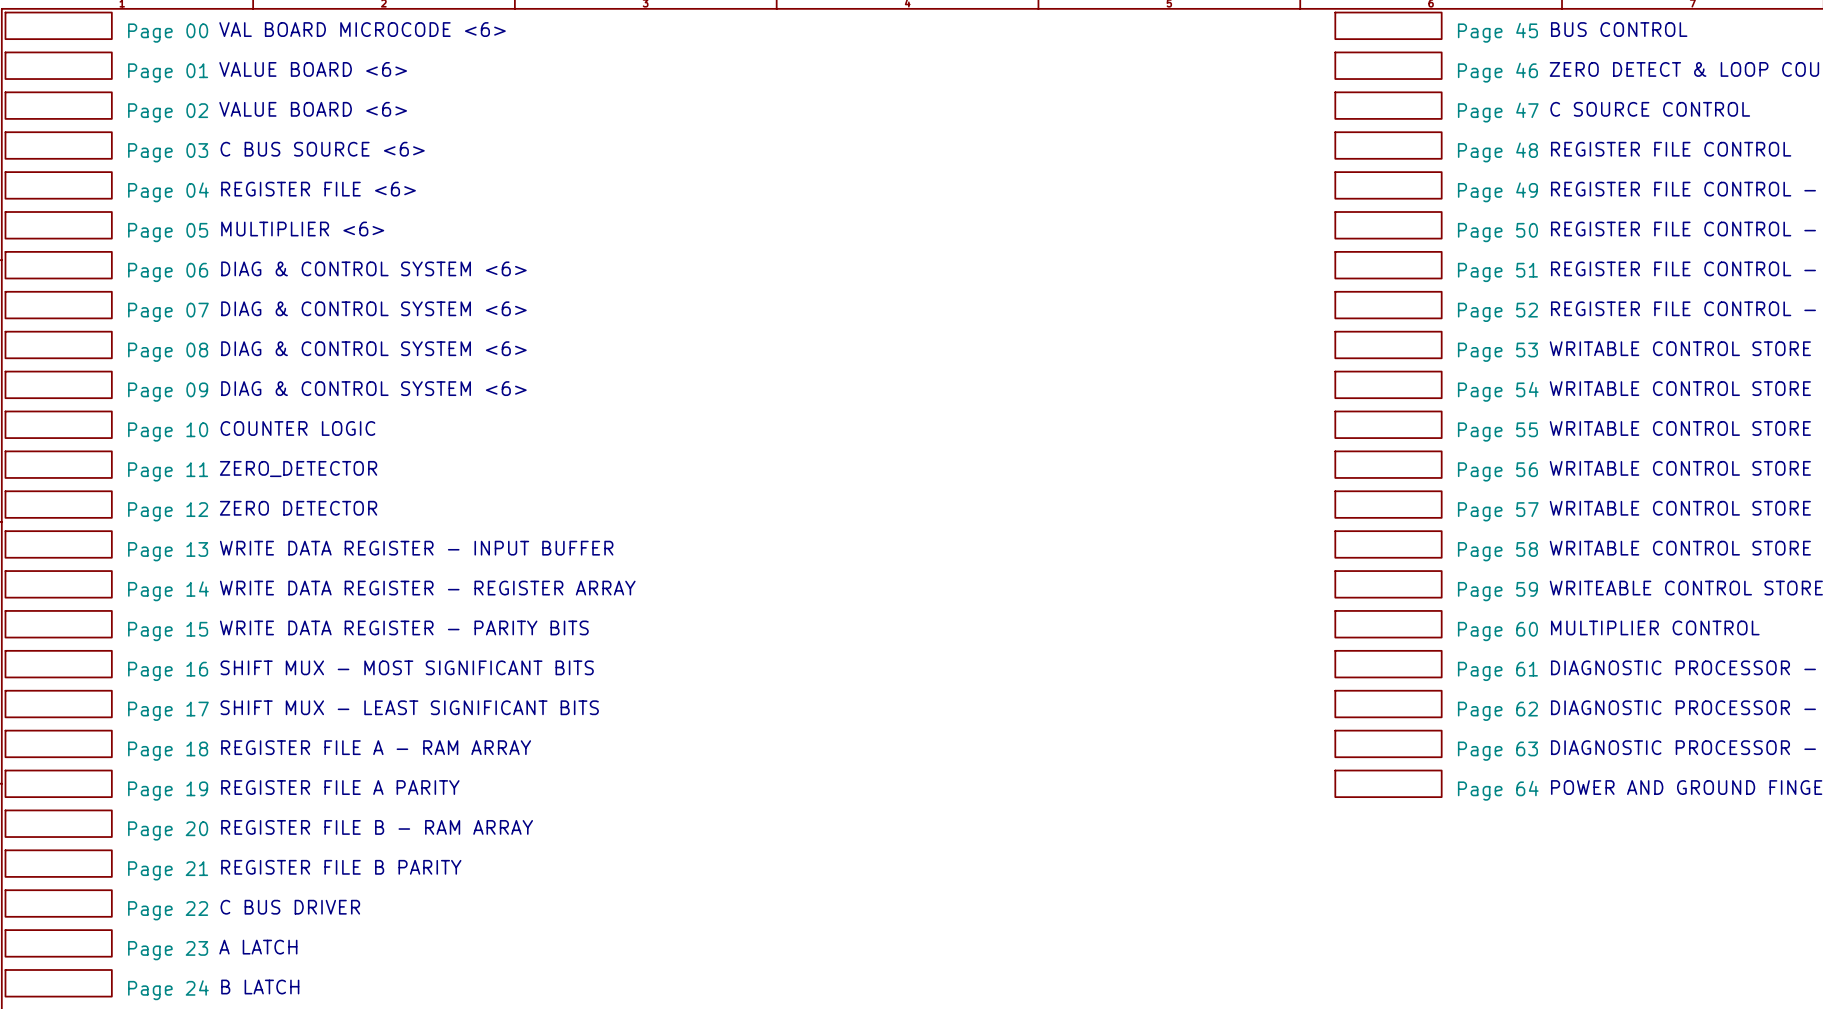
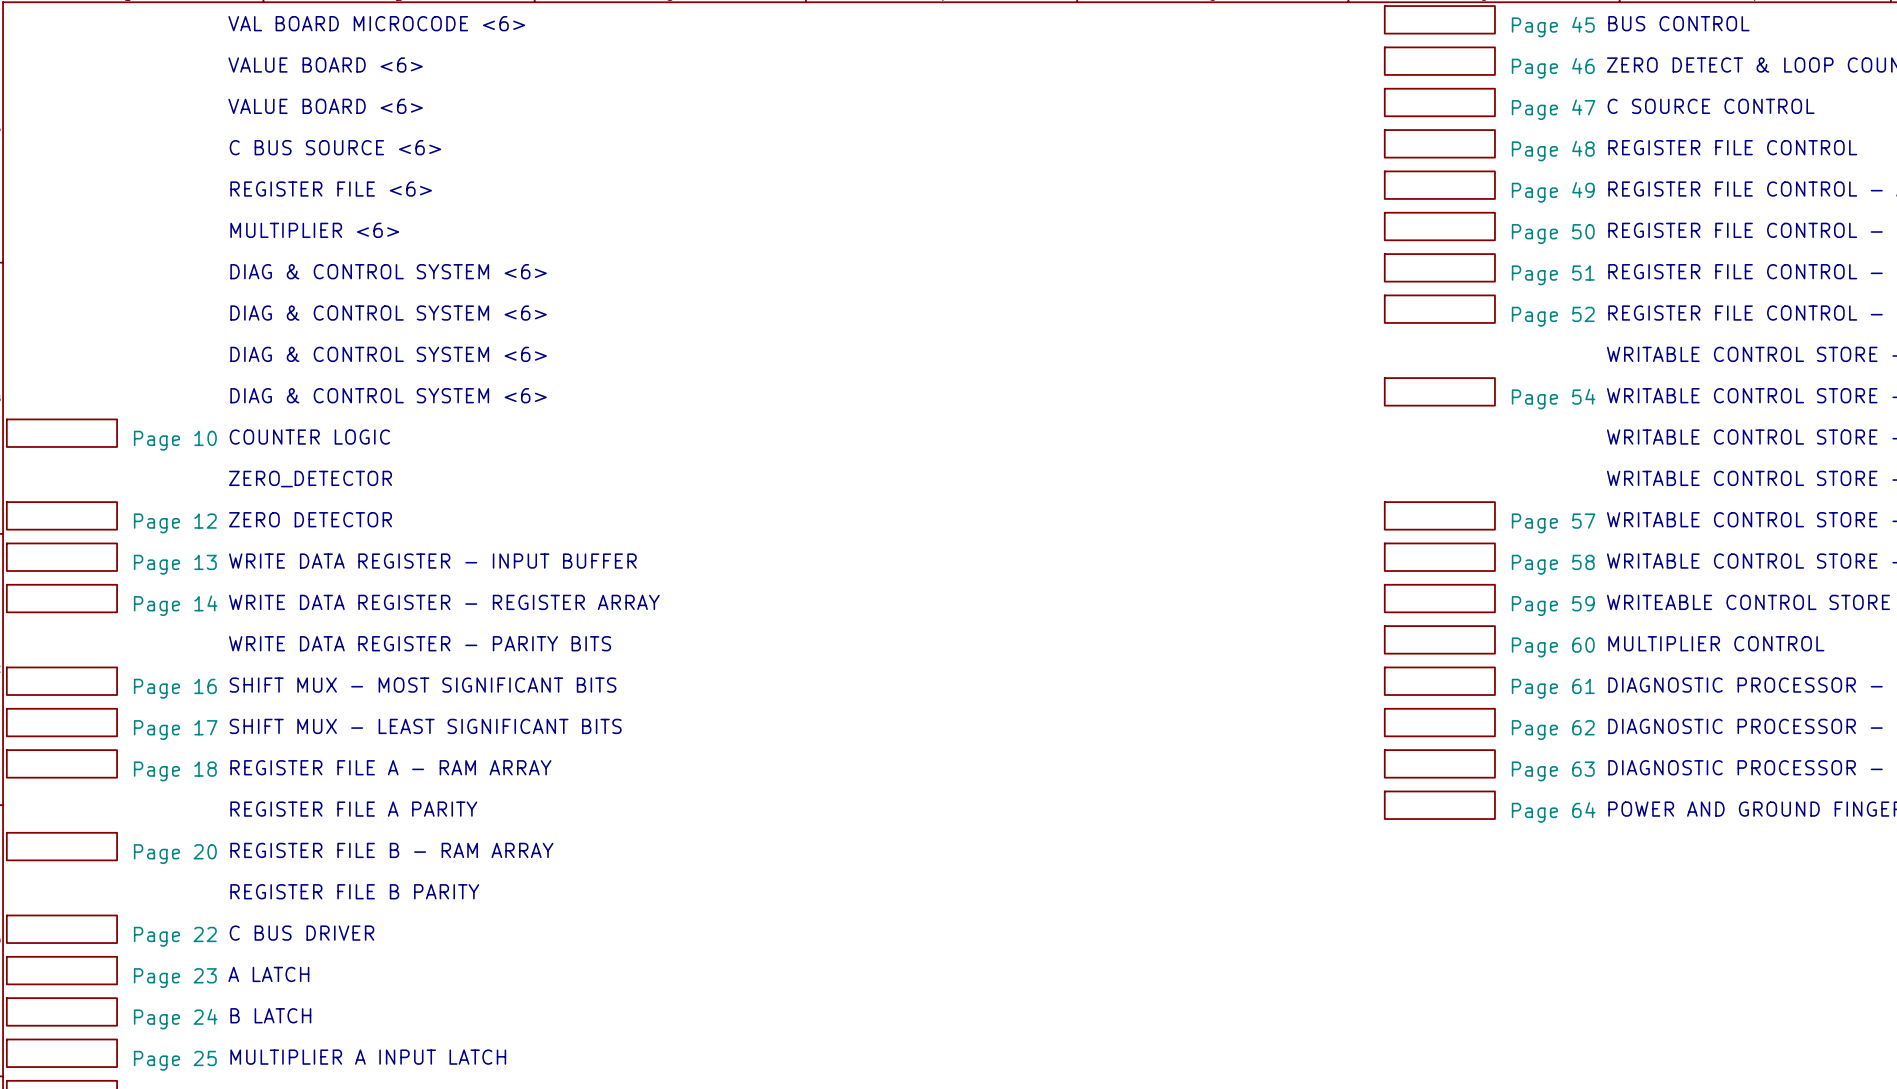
sheet Page 00: (58, 25) -> none
sheet Page 01: (58, 65) -> none
sheet Page 02: (58, 105) -> none
sheet Page 03: (58, 145) -> none
sheet Page 04: (58, 185) -> none
sheet Page 05: (58, 225) -> none
sheet Page 06: (58, 265) -> none
sheet Page 07: (58, 305) -> none
sheet Page 08: (58, 344) -> none
sheet Page 53: (1388, 344) -> none
sheet Page 09: (58, 384) -> none
sheet Page 55: (1388, 424) -> none
sheet Page 11: (58, 464) -> none
sheet Page 56: (1388, 464) -> none
sheet Page 15: (58, 624) -> none
sheet Page 19: (58, 783) -> none
sheet Page 21: (58, 863) -> none

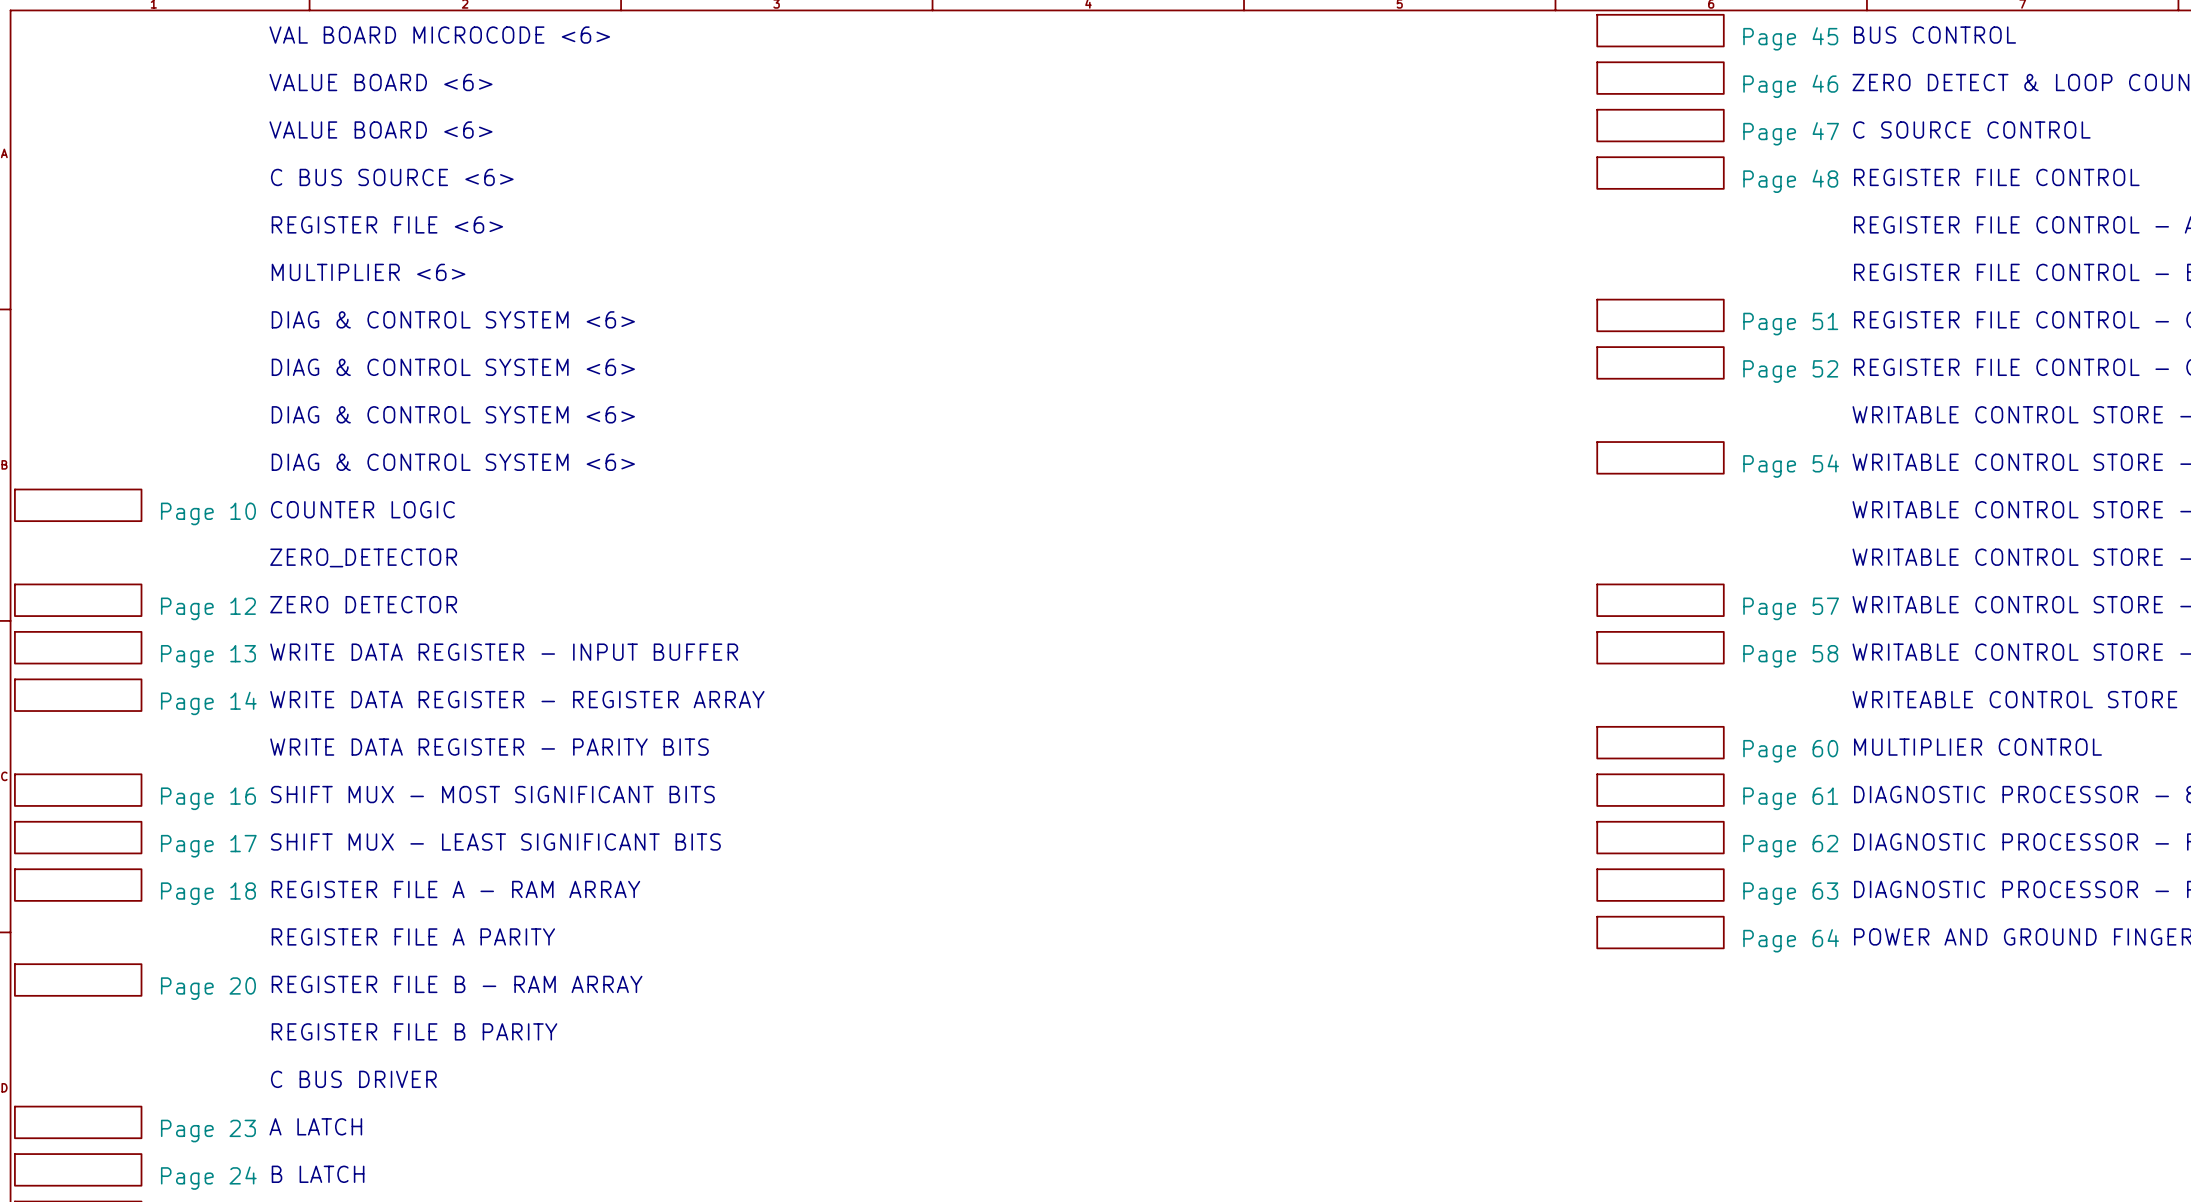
sheet Page 49: (1439, 185) -> none
sheet Page 50: (1439, 226) -> none
sheet Page 59: (1439, 598) -> none
sheet Page 22: (61, 929) -> none

